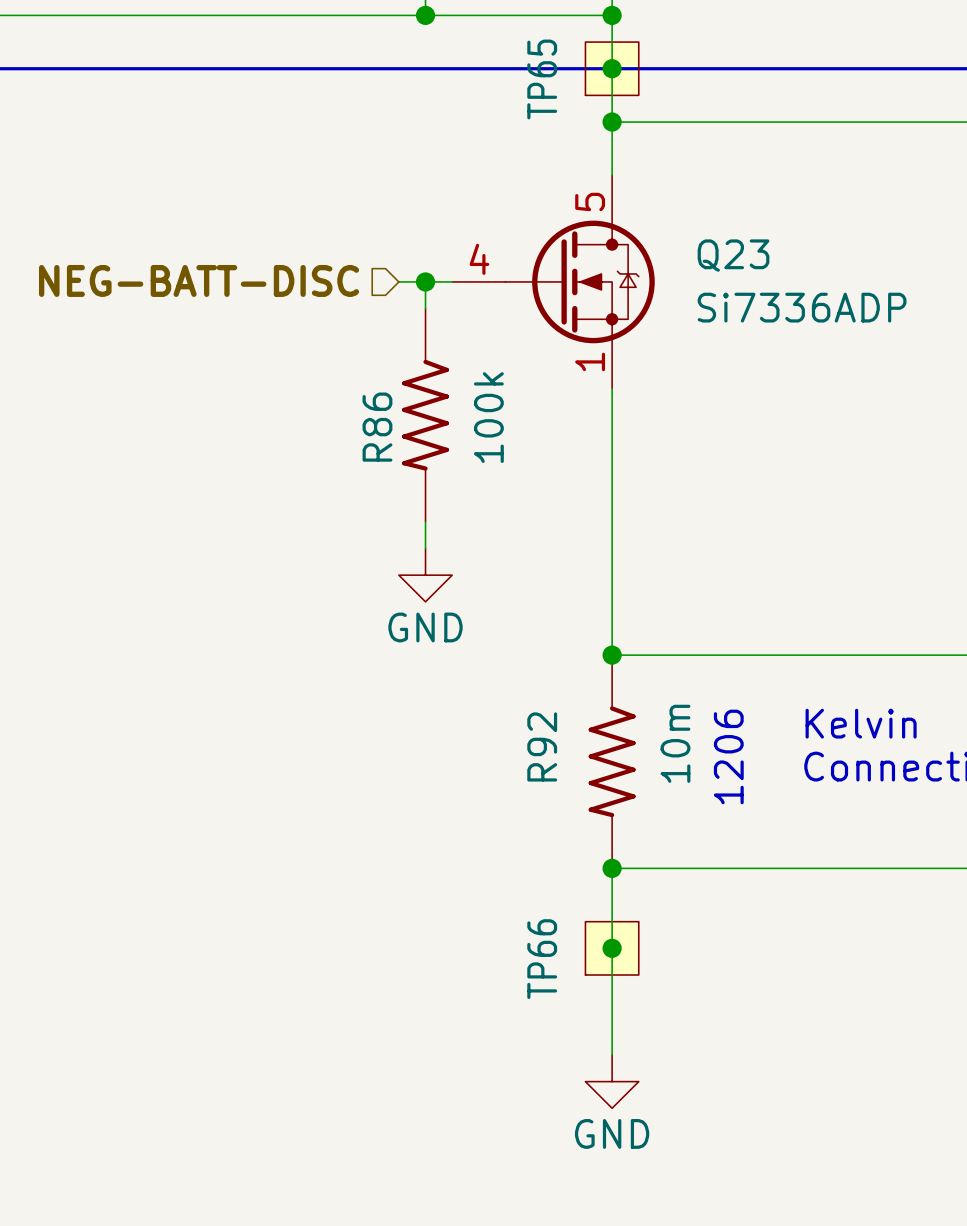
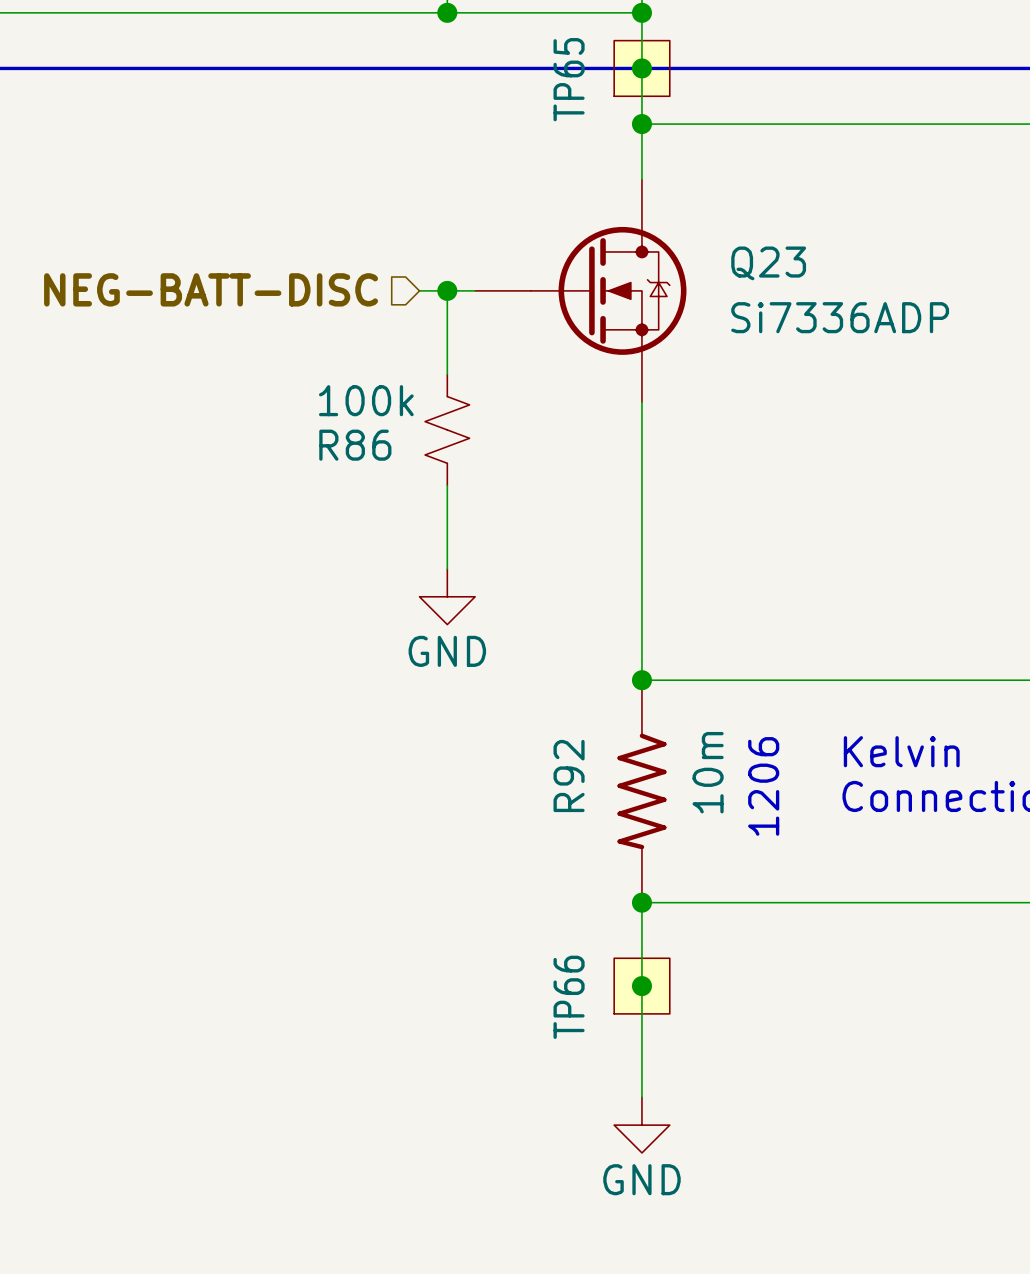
Q23 pin number: 5 (590, 201) -> none
Q23 pin number: 4 (479, 259) -> none
R86 symbol: [402, 308, 449, 522] -> [425, 374, 470, 486]
Q23 pin number: 1 (590, 361) -> none
R86 value position: 100k (488, 417) -> 100k (366, 400)
R86 name position: R86 (377, 427) -> R86 (355, 445)

